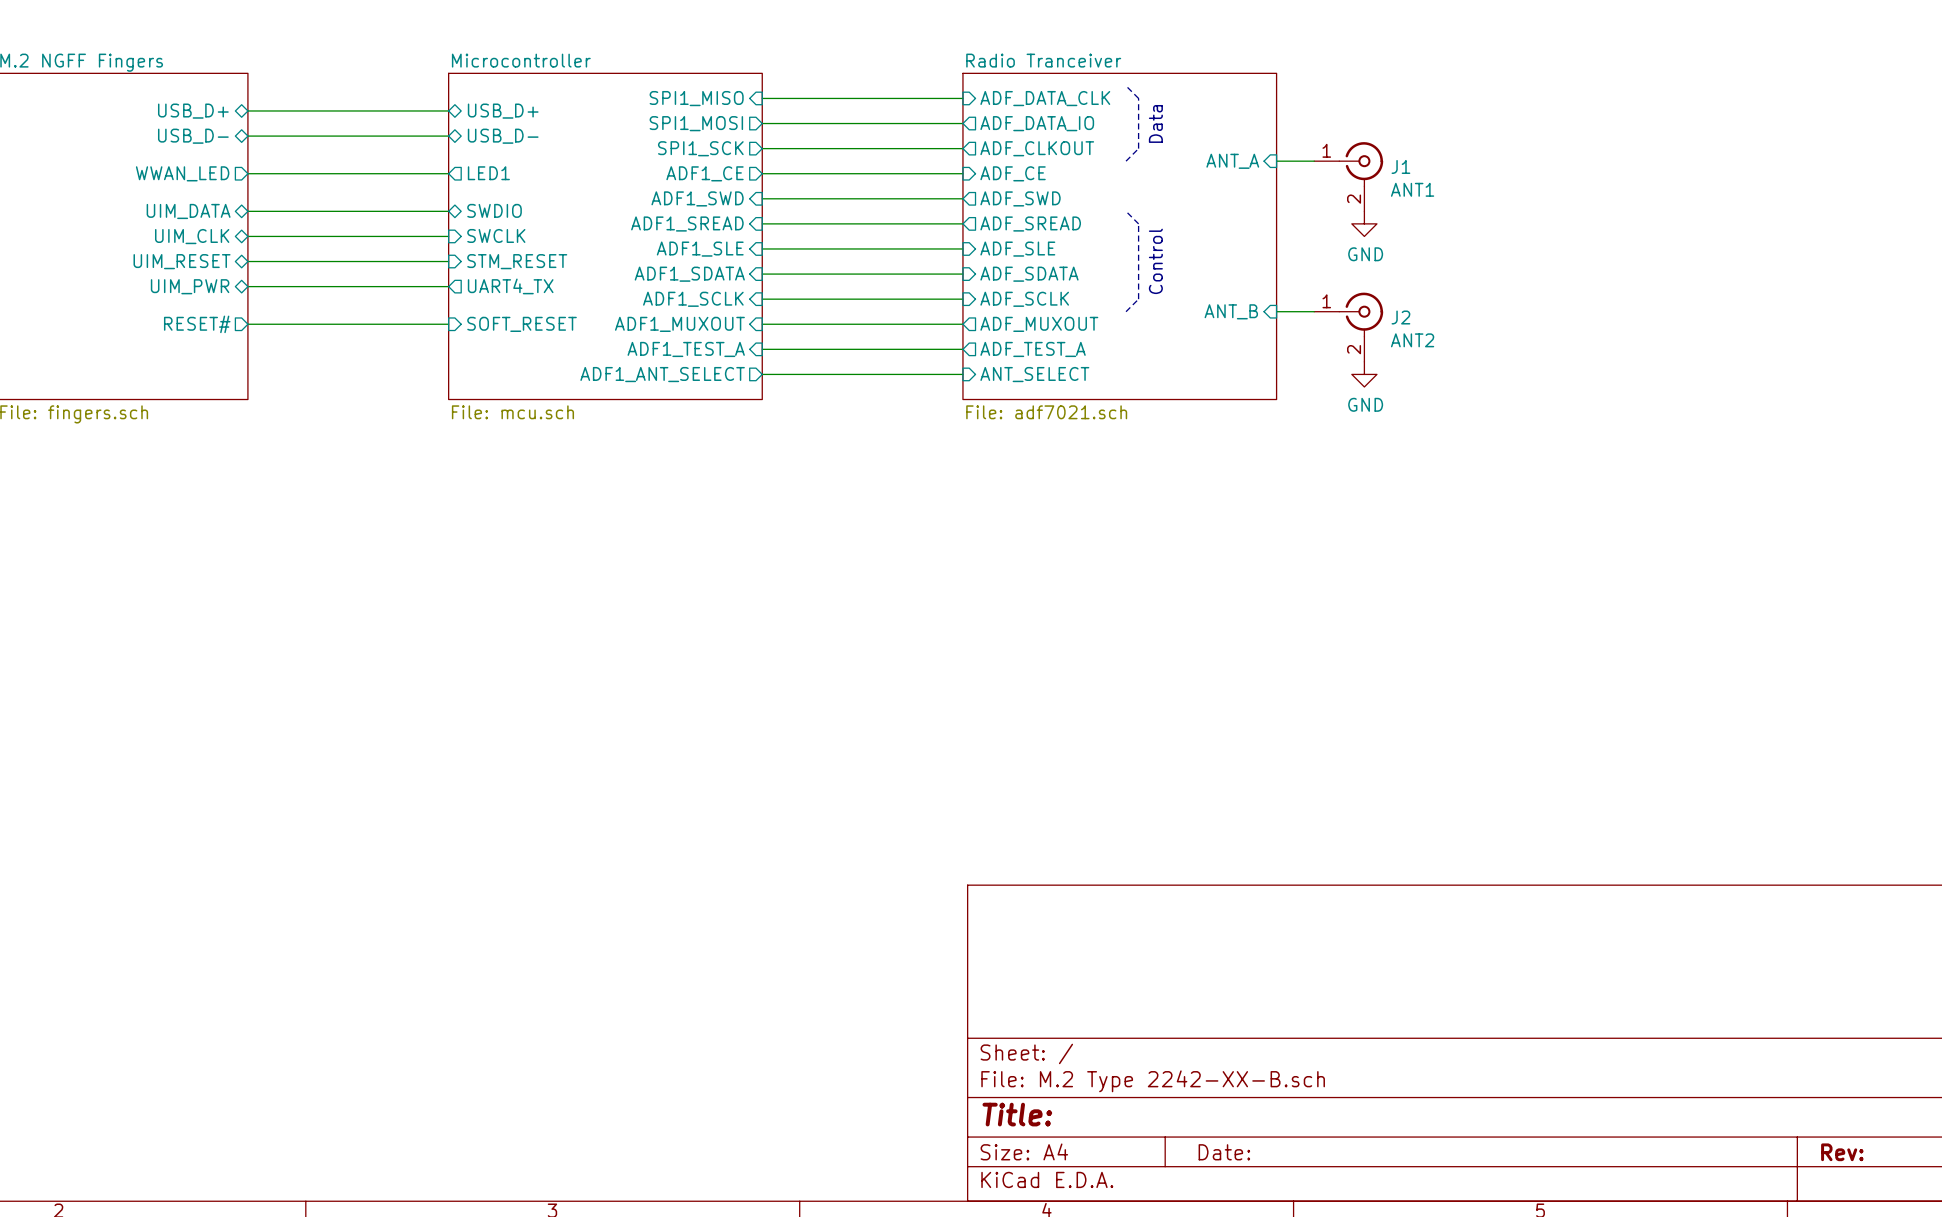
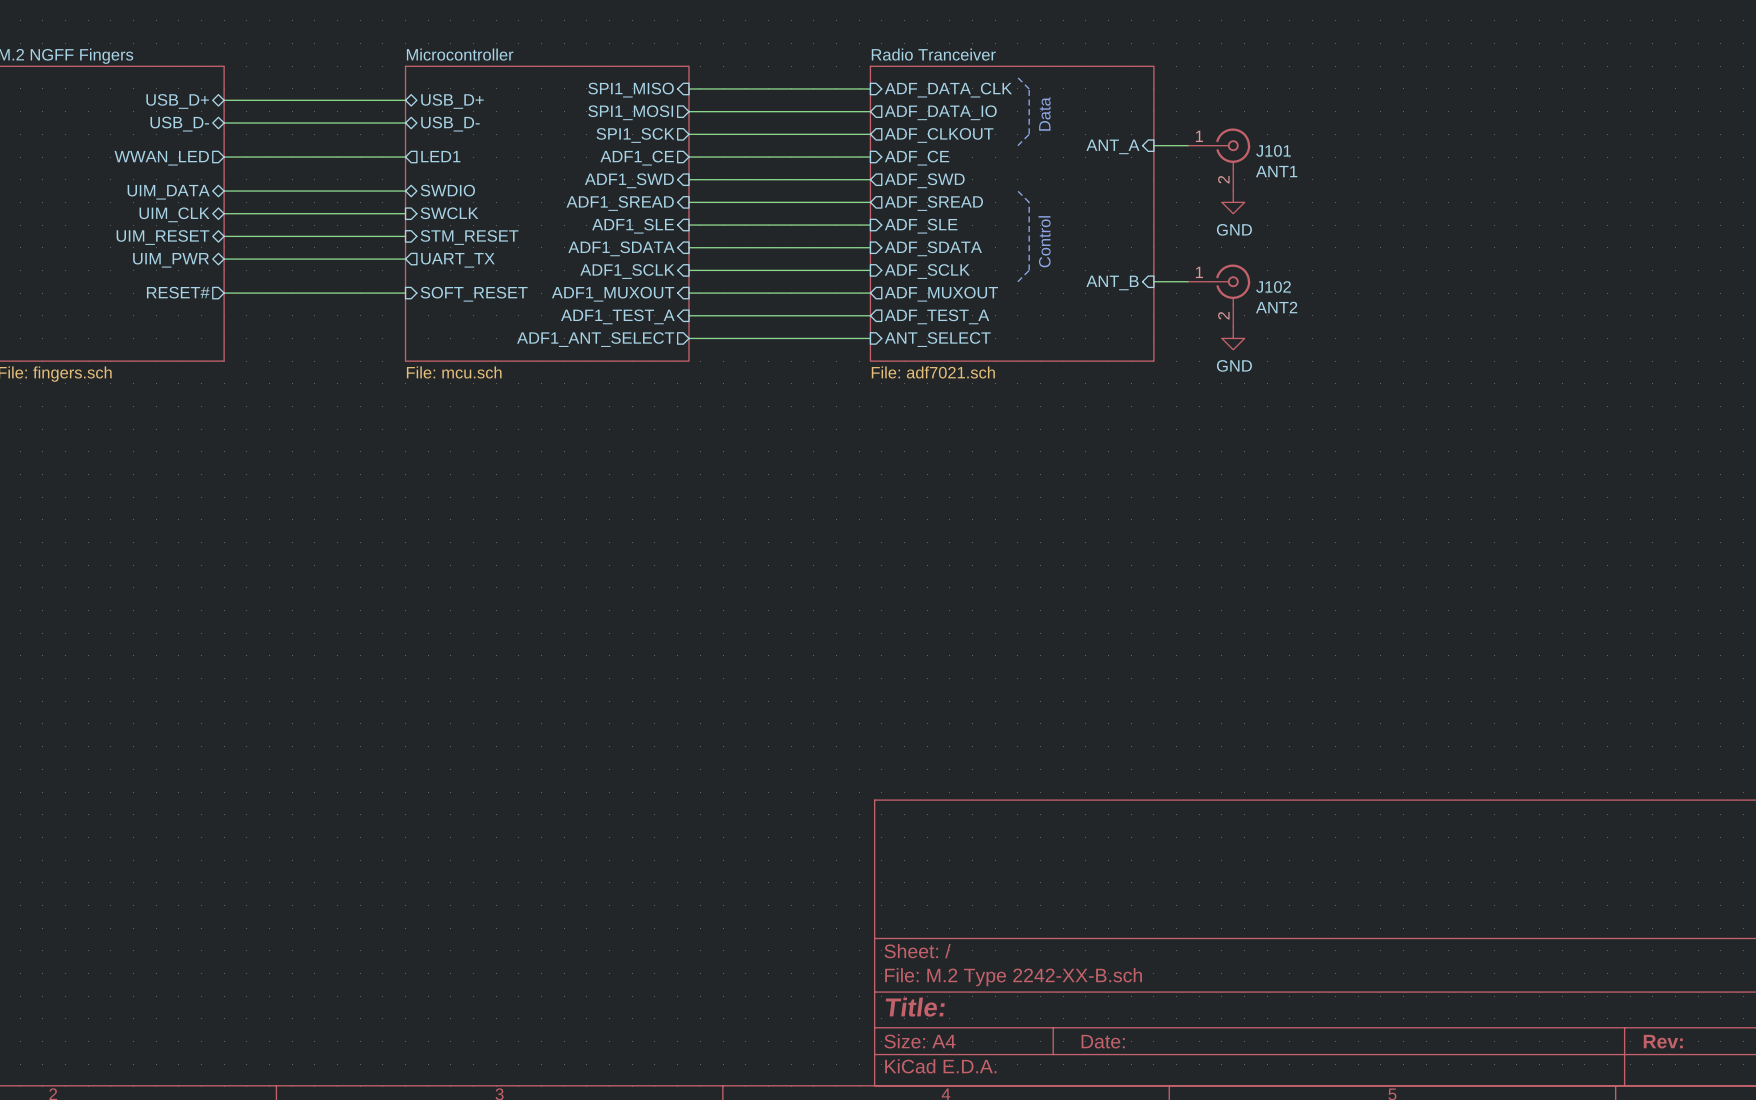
J1 name: J1 (1400, 166) -> J101 (1273, 150)
sheet pin: UART4_TX (510, 286) -> UART_TX (457, 260)
J2 name: J2 (1400, 317) -> J102 (1273, 286)

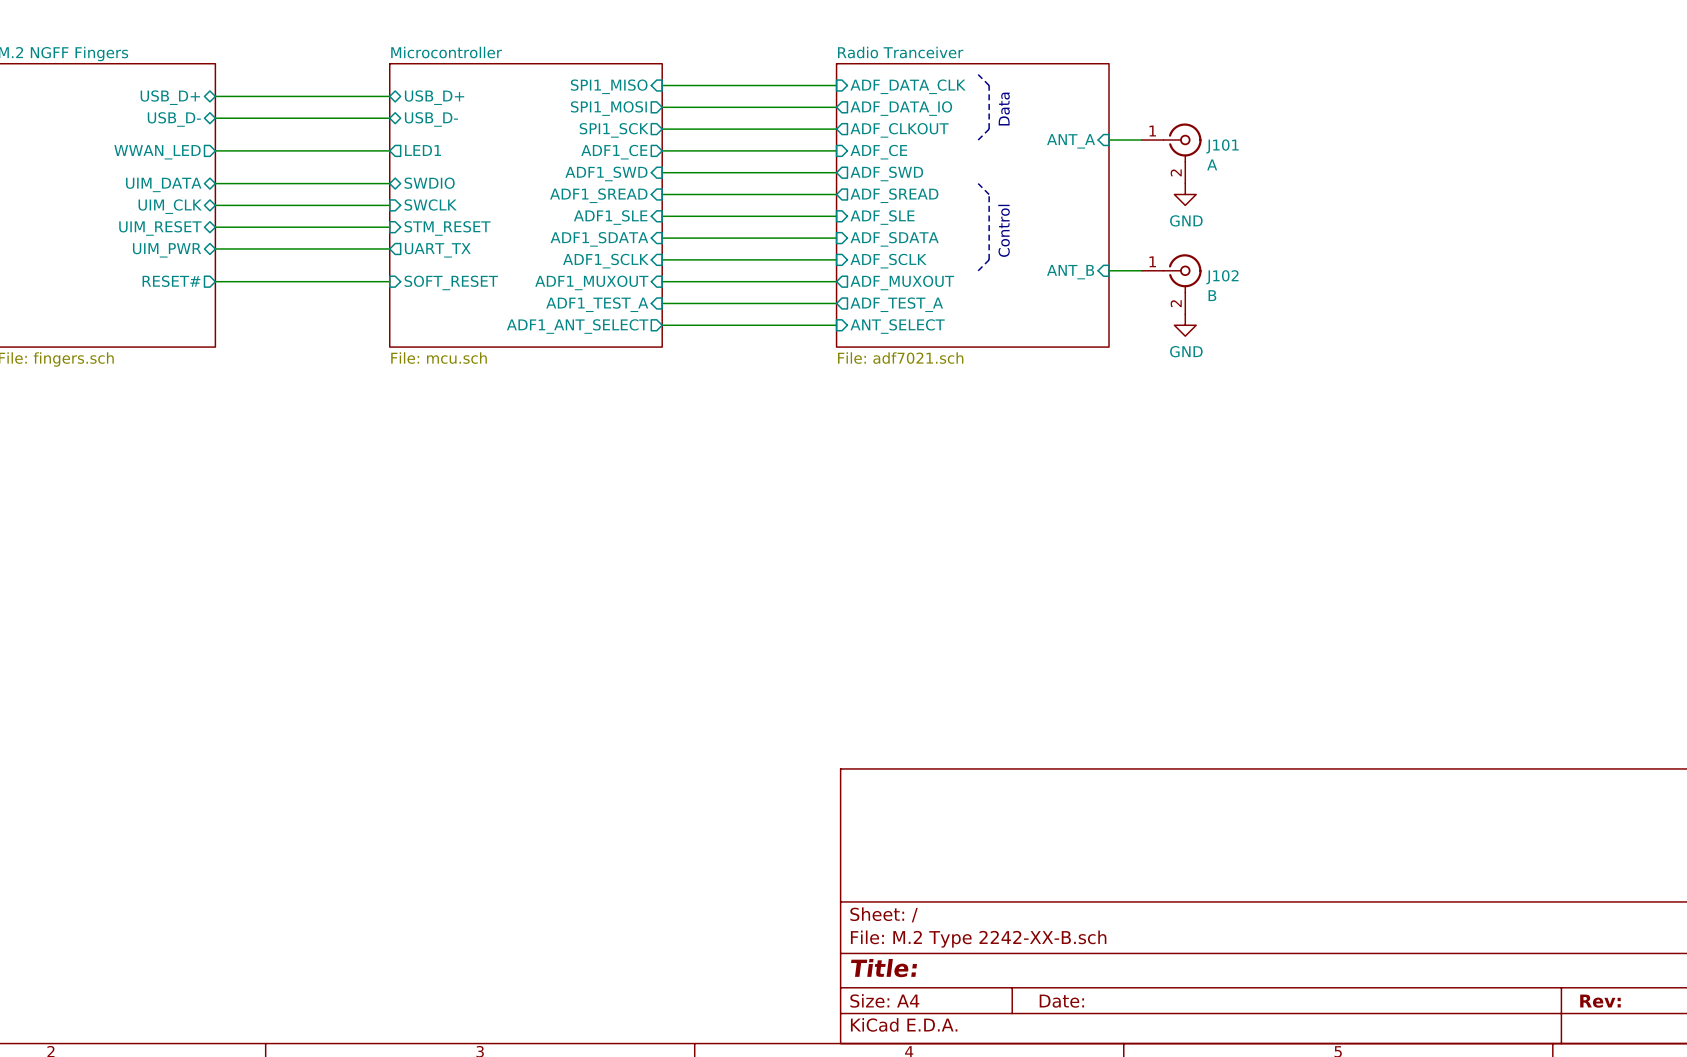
J101 value: ANT1 (1276, 171) -> A (1212, 164)
J102 value: ANT2 (1276, 307) -> B (1212, 295)

